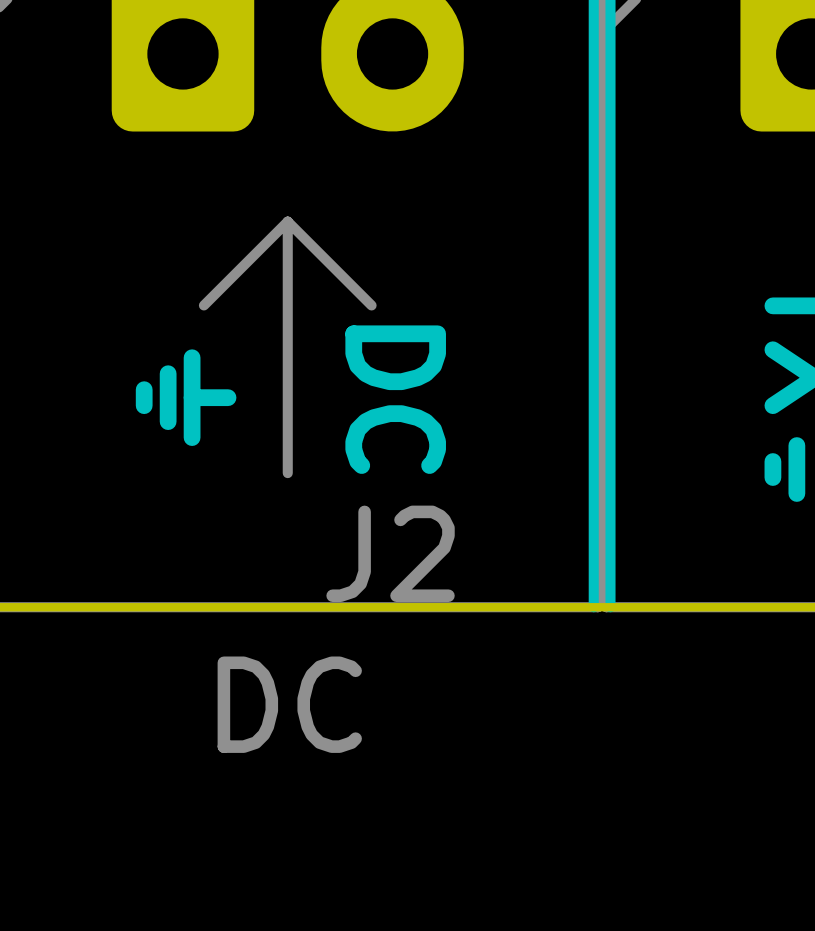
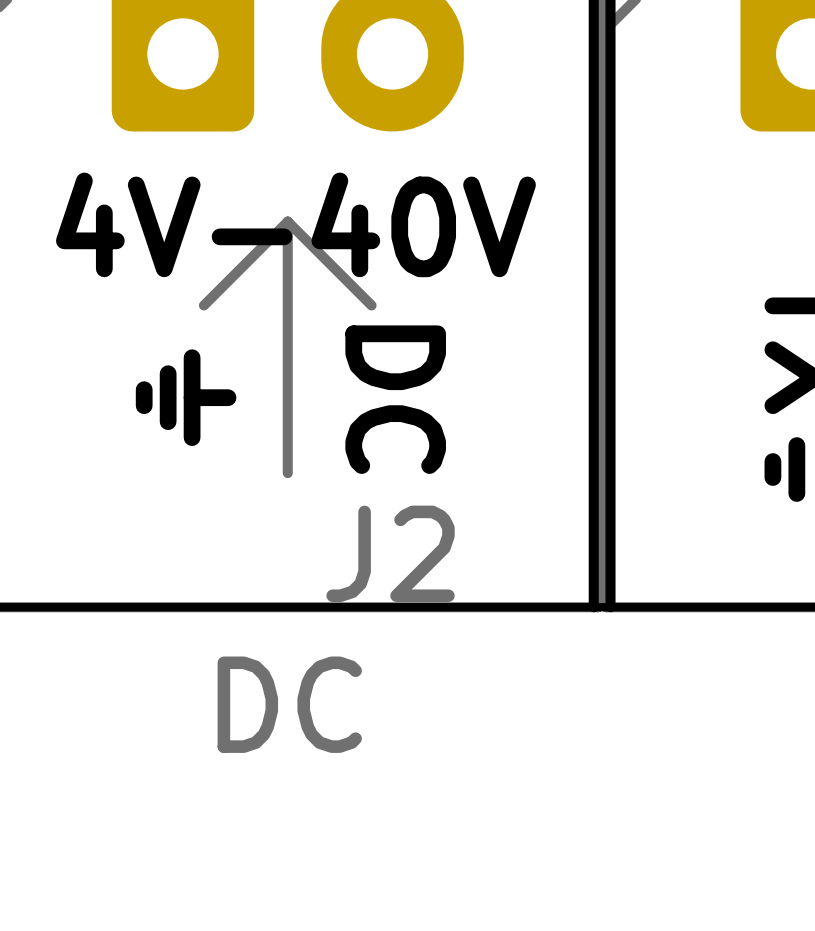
text: none -> 4V-40V (295, 224)

